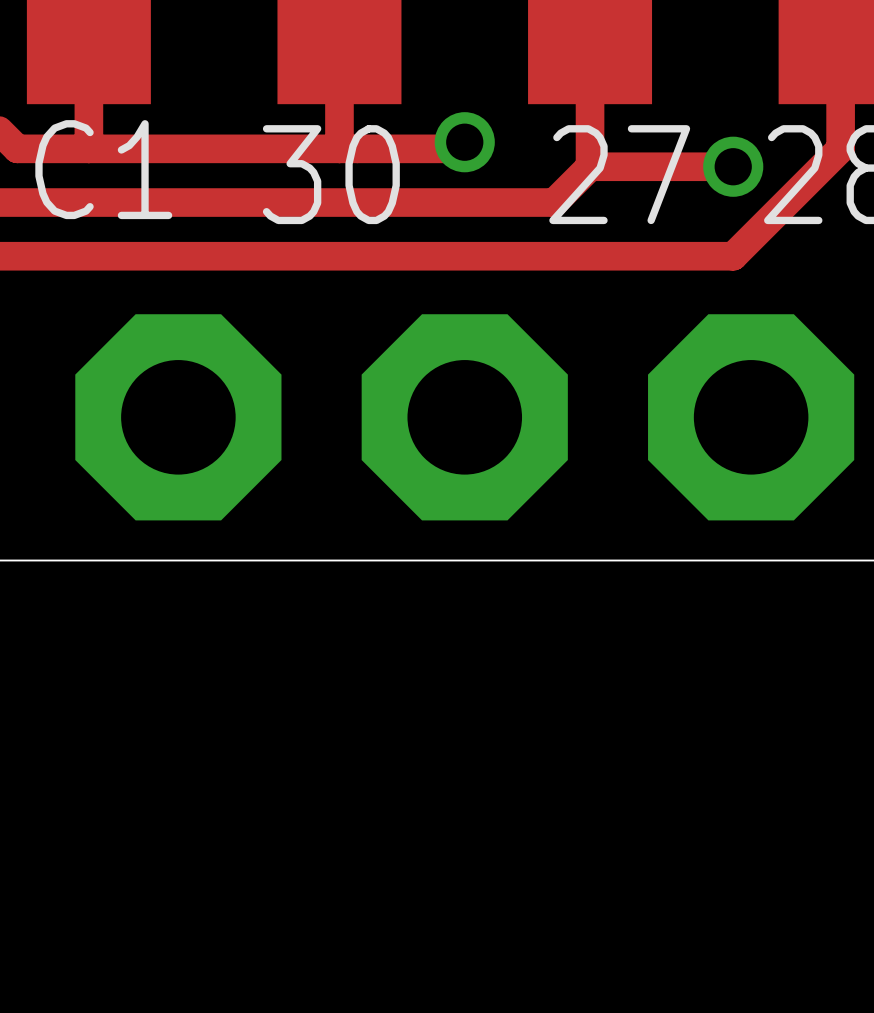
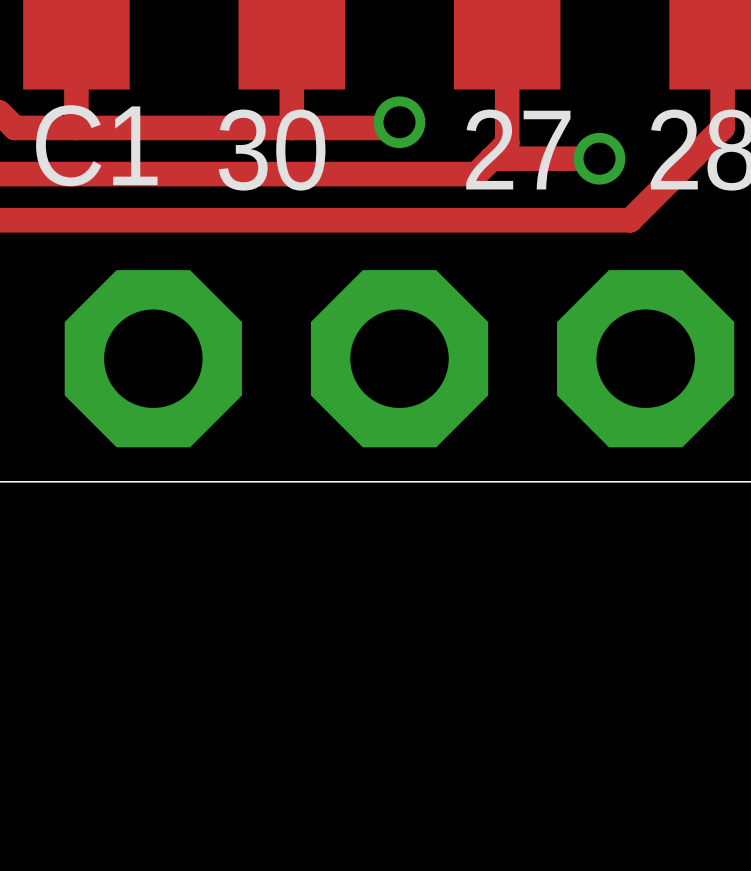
track: (590, 166) (733, 166) -> none
via position: (733, 166) -> (599, 158)
track: none -> (491, 158) (599, 158)

